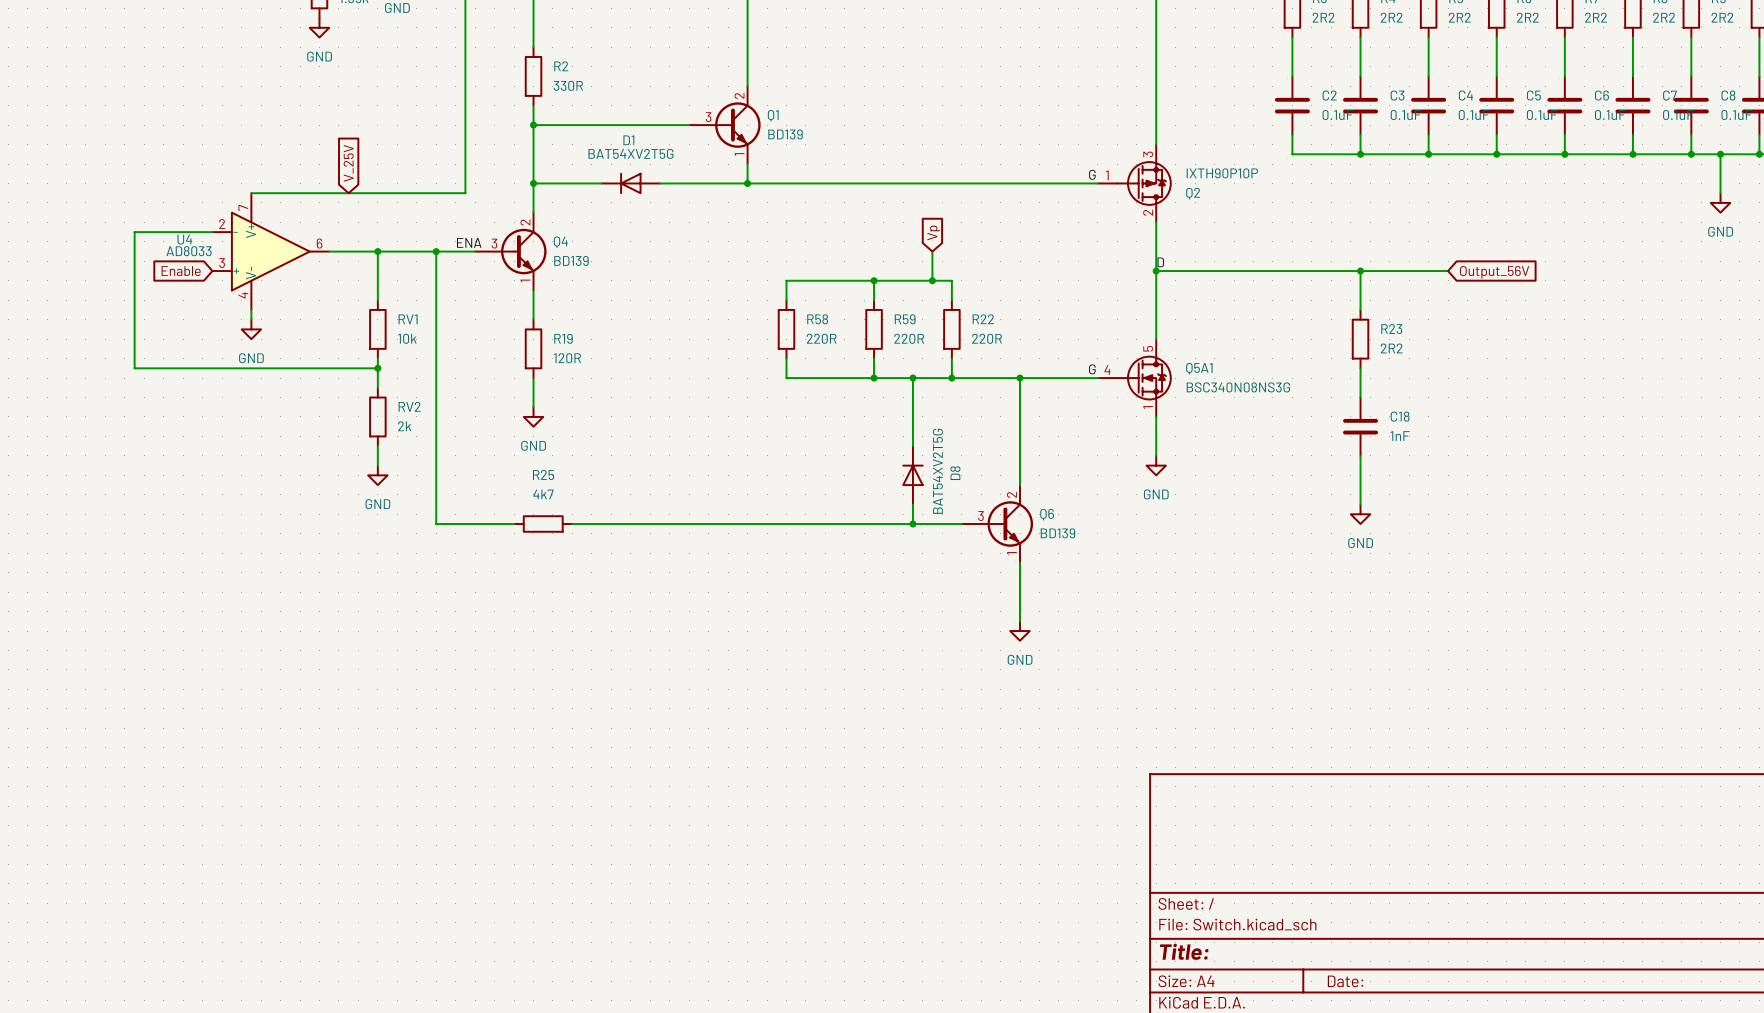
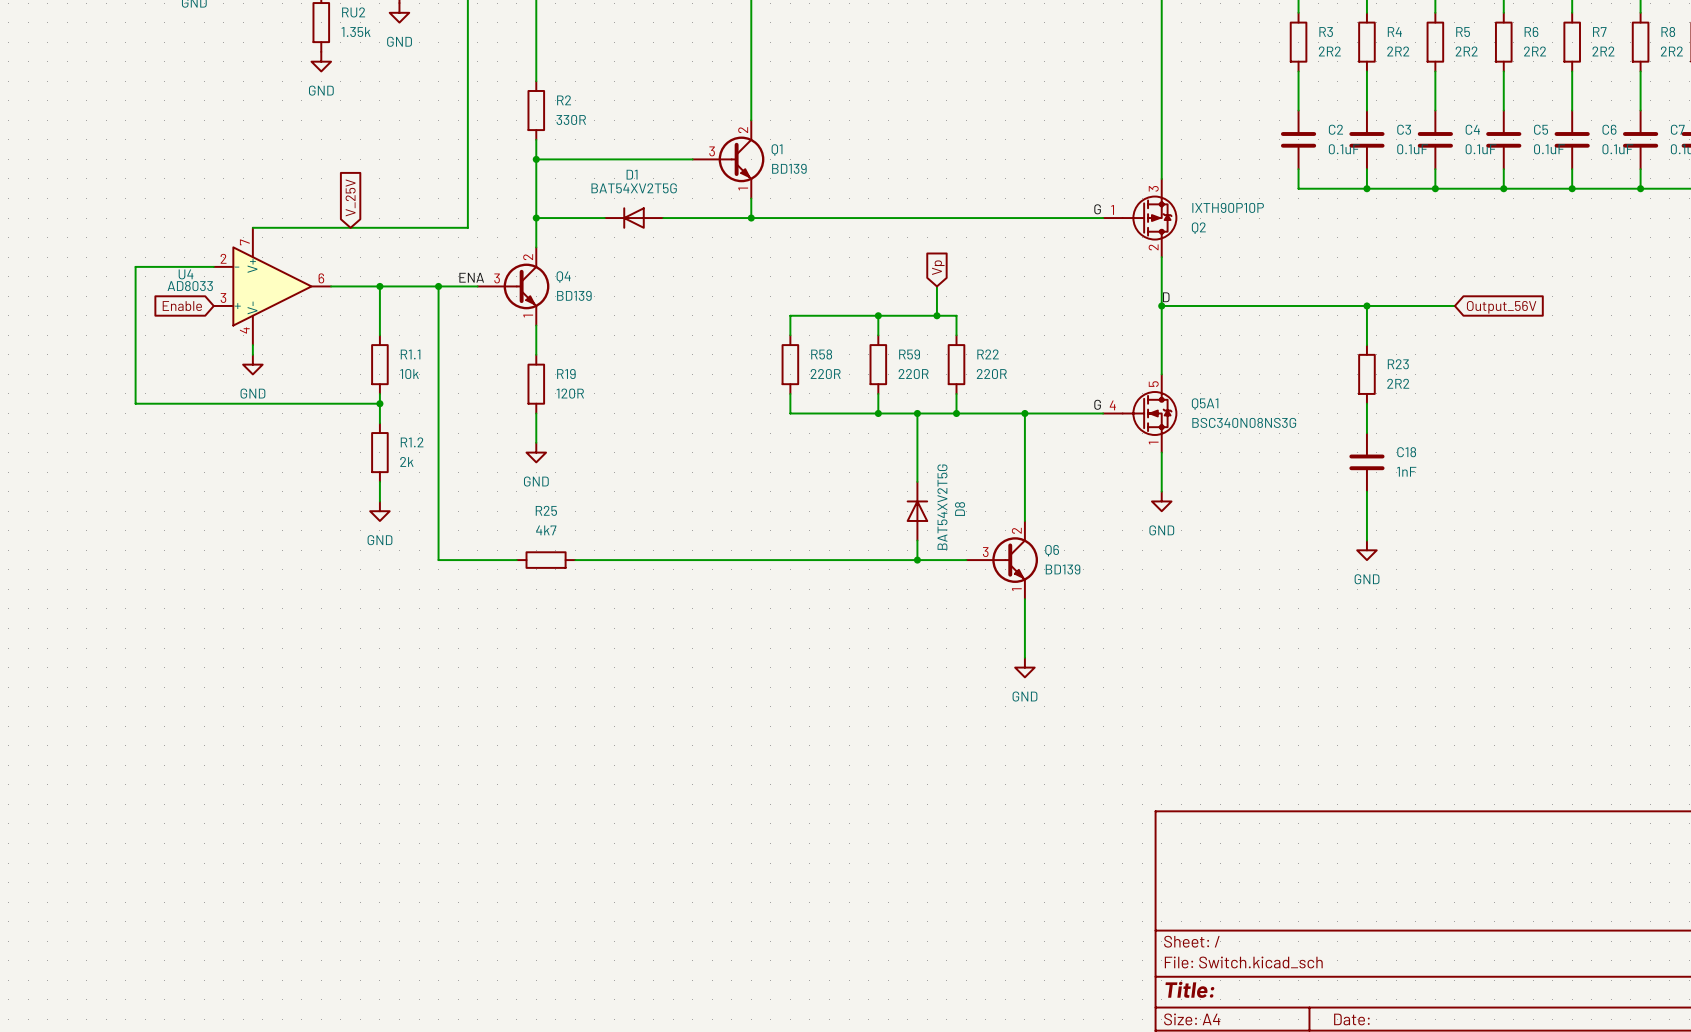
RV1 name: RV1 (408, 319) -> R1.1 (410, 354)
RV2 name: RV2 (409, 406) -> R1.2 (412, 442)

